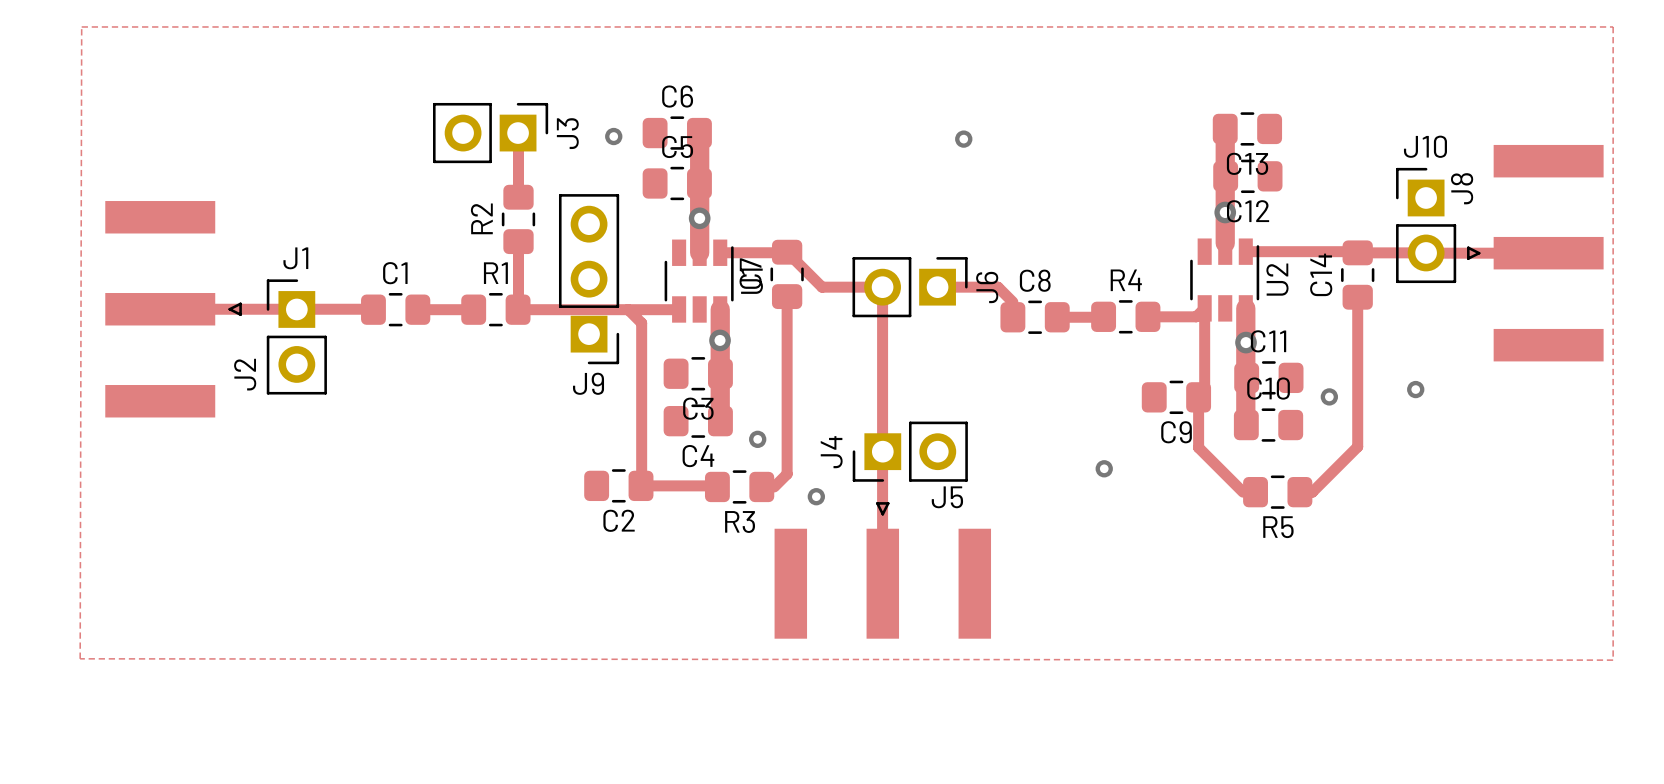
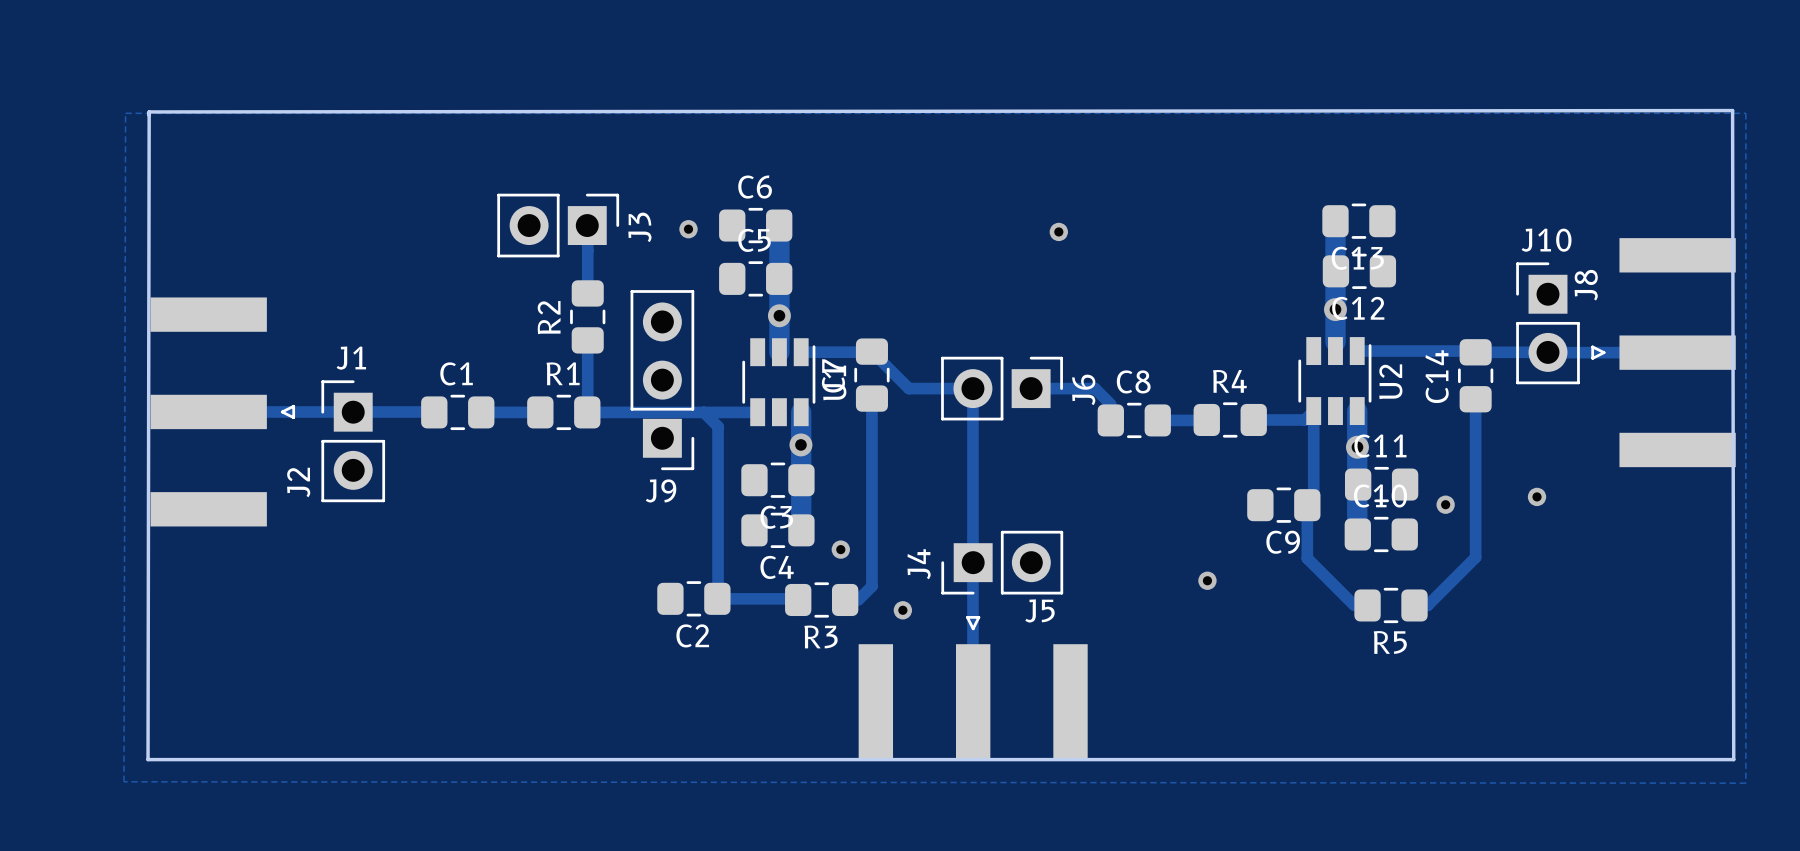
board edge: none -> (149, 112) (148, 759) (1733, 759) (1732, 110) (149, 111) (149, 115)

